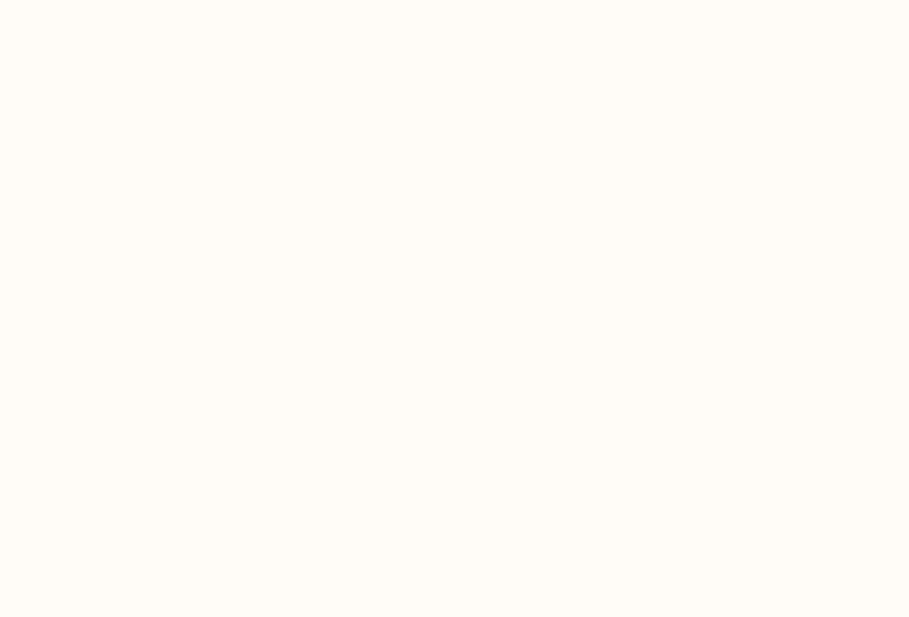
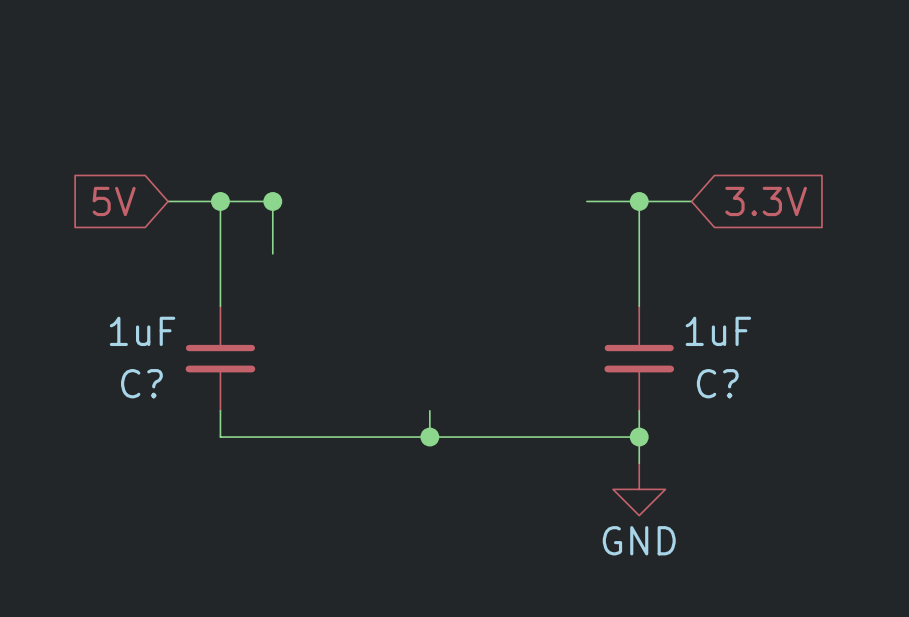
global label: none -> 5V (114, 201)
wire: none -> (168, 201) (272, 201) (272, 253)
wire: none -> (220, 201) (220, 306)
junction: none -> (220, 201)
junction: none -> (272, 201)
wire: none -> (586, 201) (691, 201)
wire: none -> (639, 201) (639, 306)
junction: none -> (639, 201)
global label: none -> 3.3V (766, 201)
C?: none -> 1uF (220, 358)
C?: none -> 1uF (639, 358)
wire: none -> (220, 410) (220, 437) (639, 437)
wire: none -> (429, 410) (429, 437)
wire: none -> (639, 410) (639, 463)
junction: none -> (429, 437)
junction: none -> (639, 437)
power symbol: none -> GND (639, 489)

